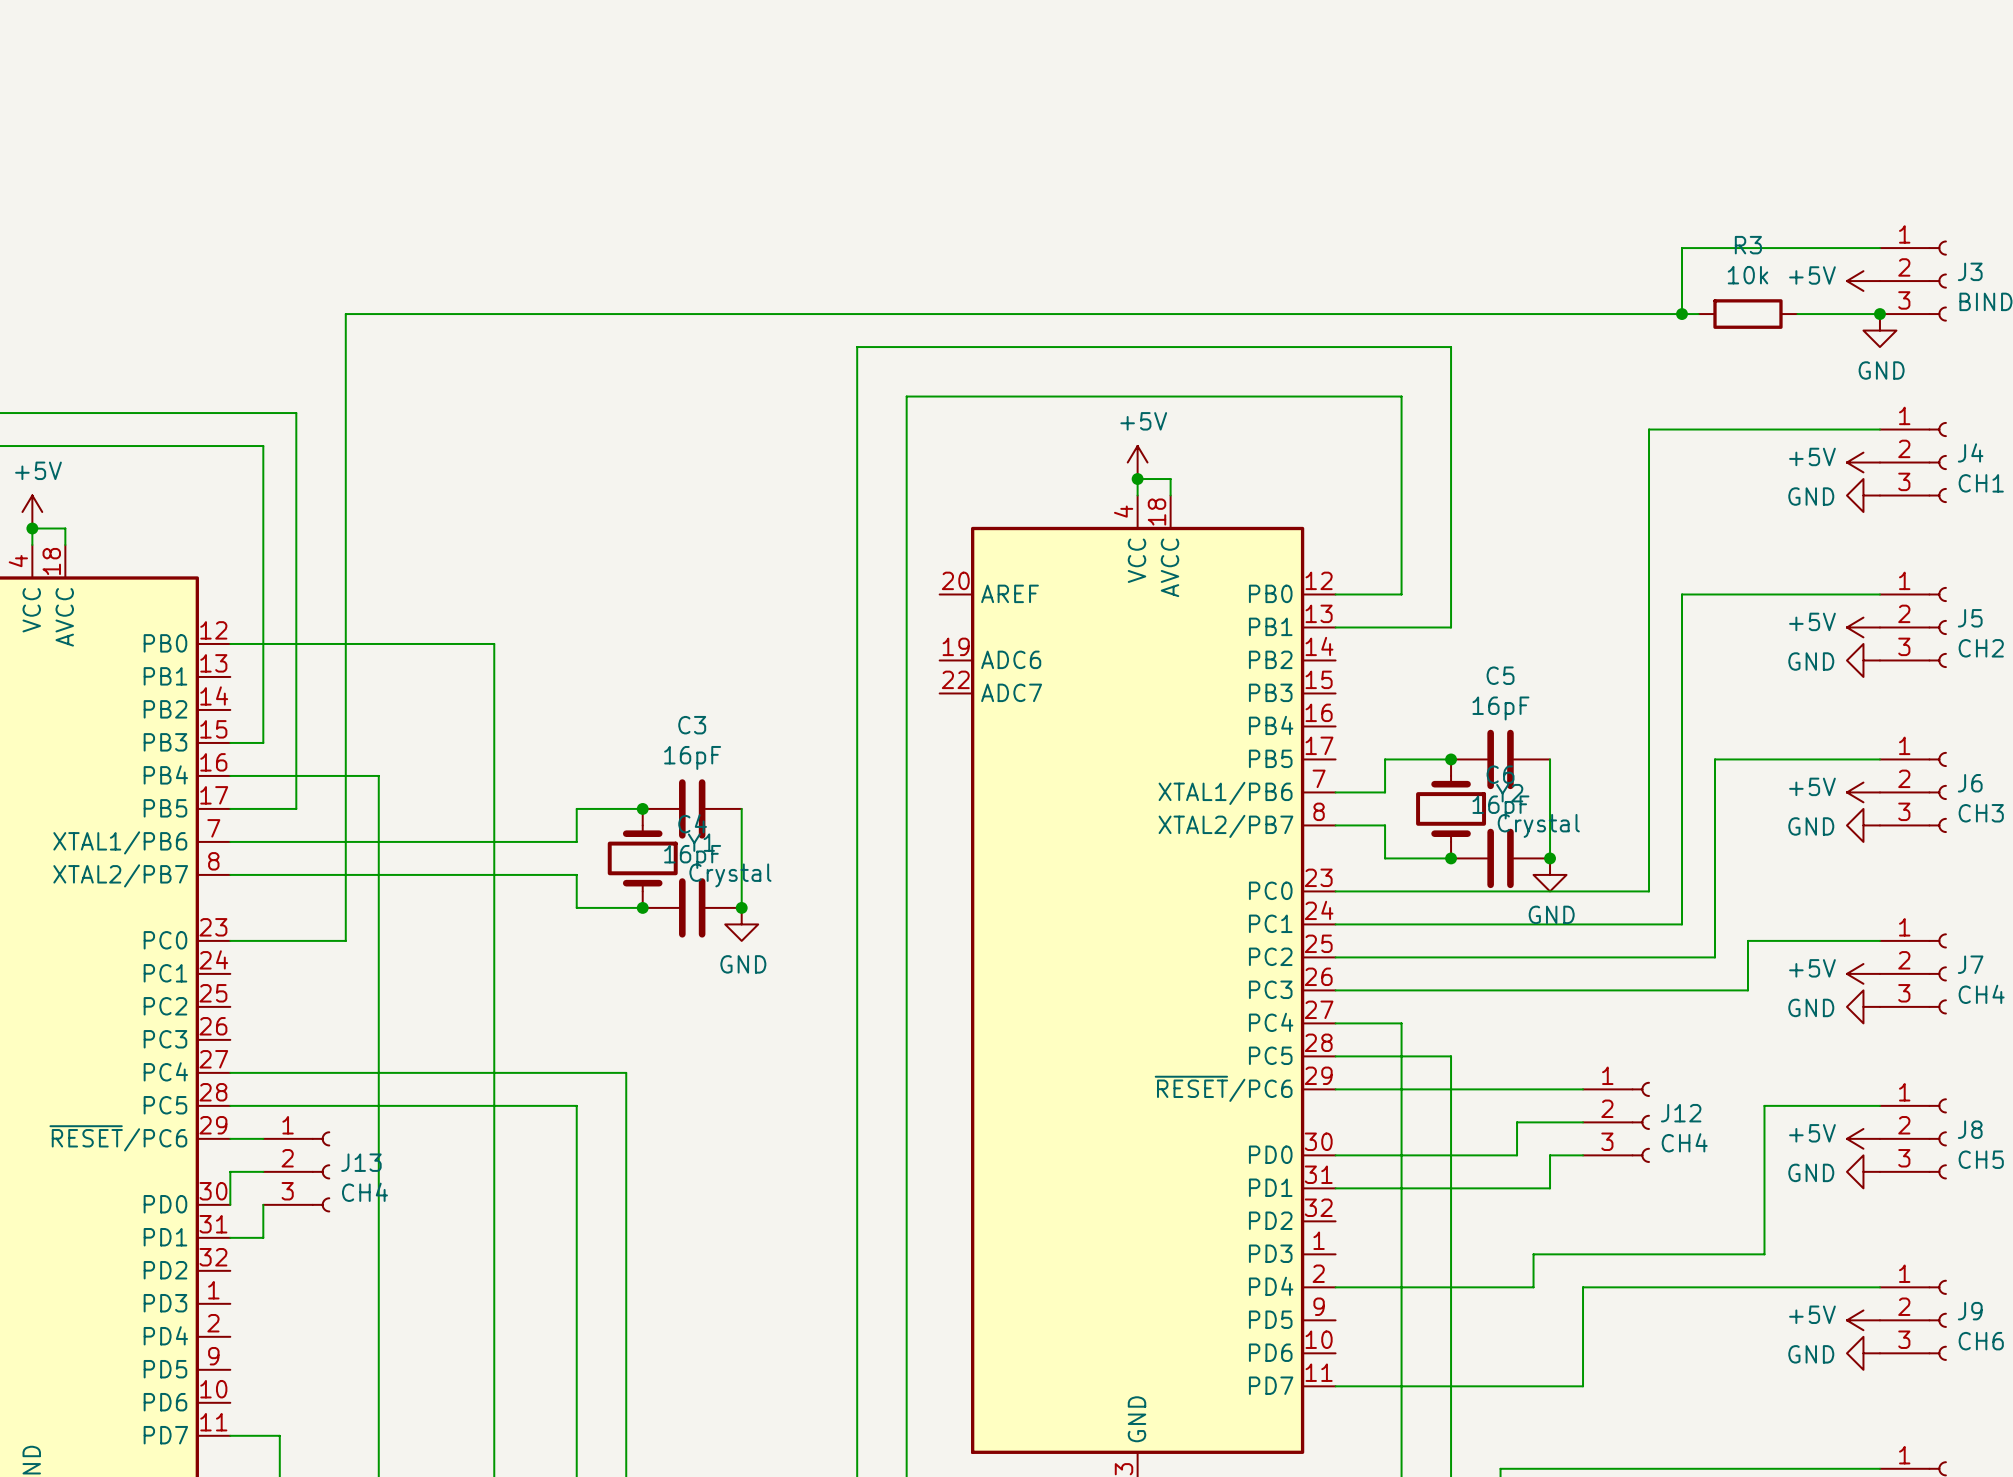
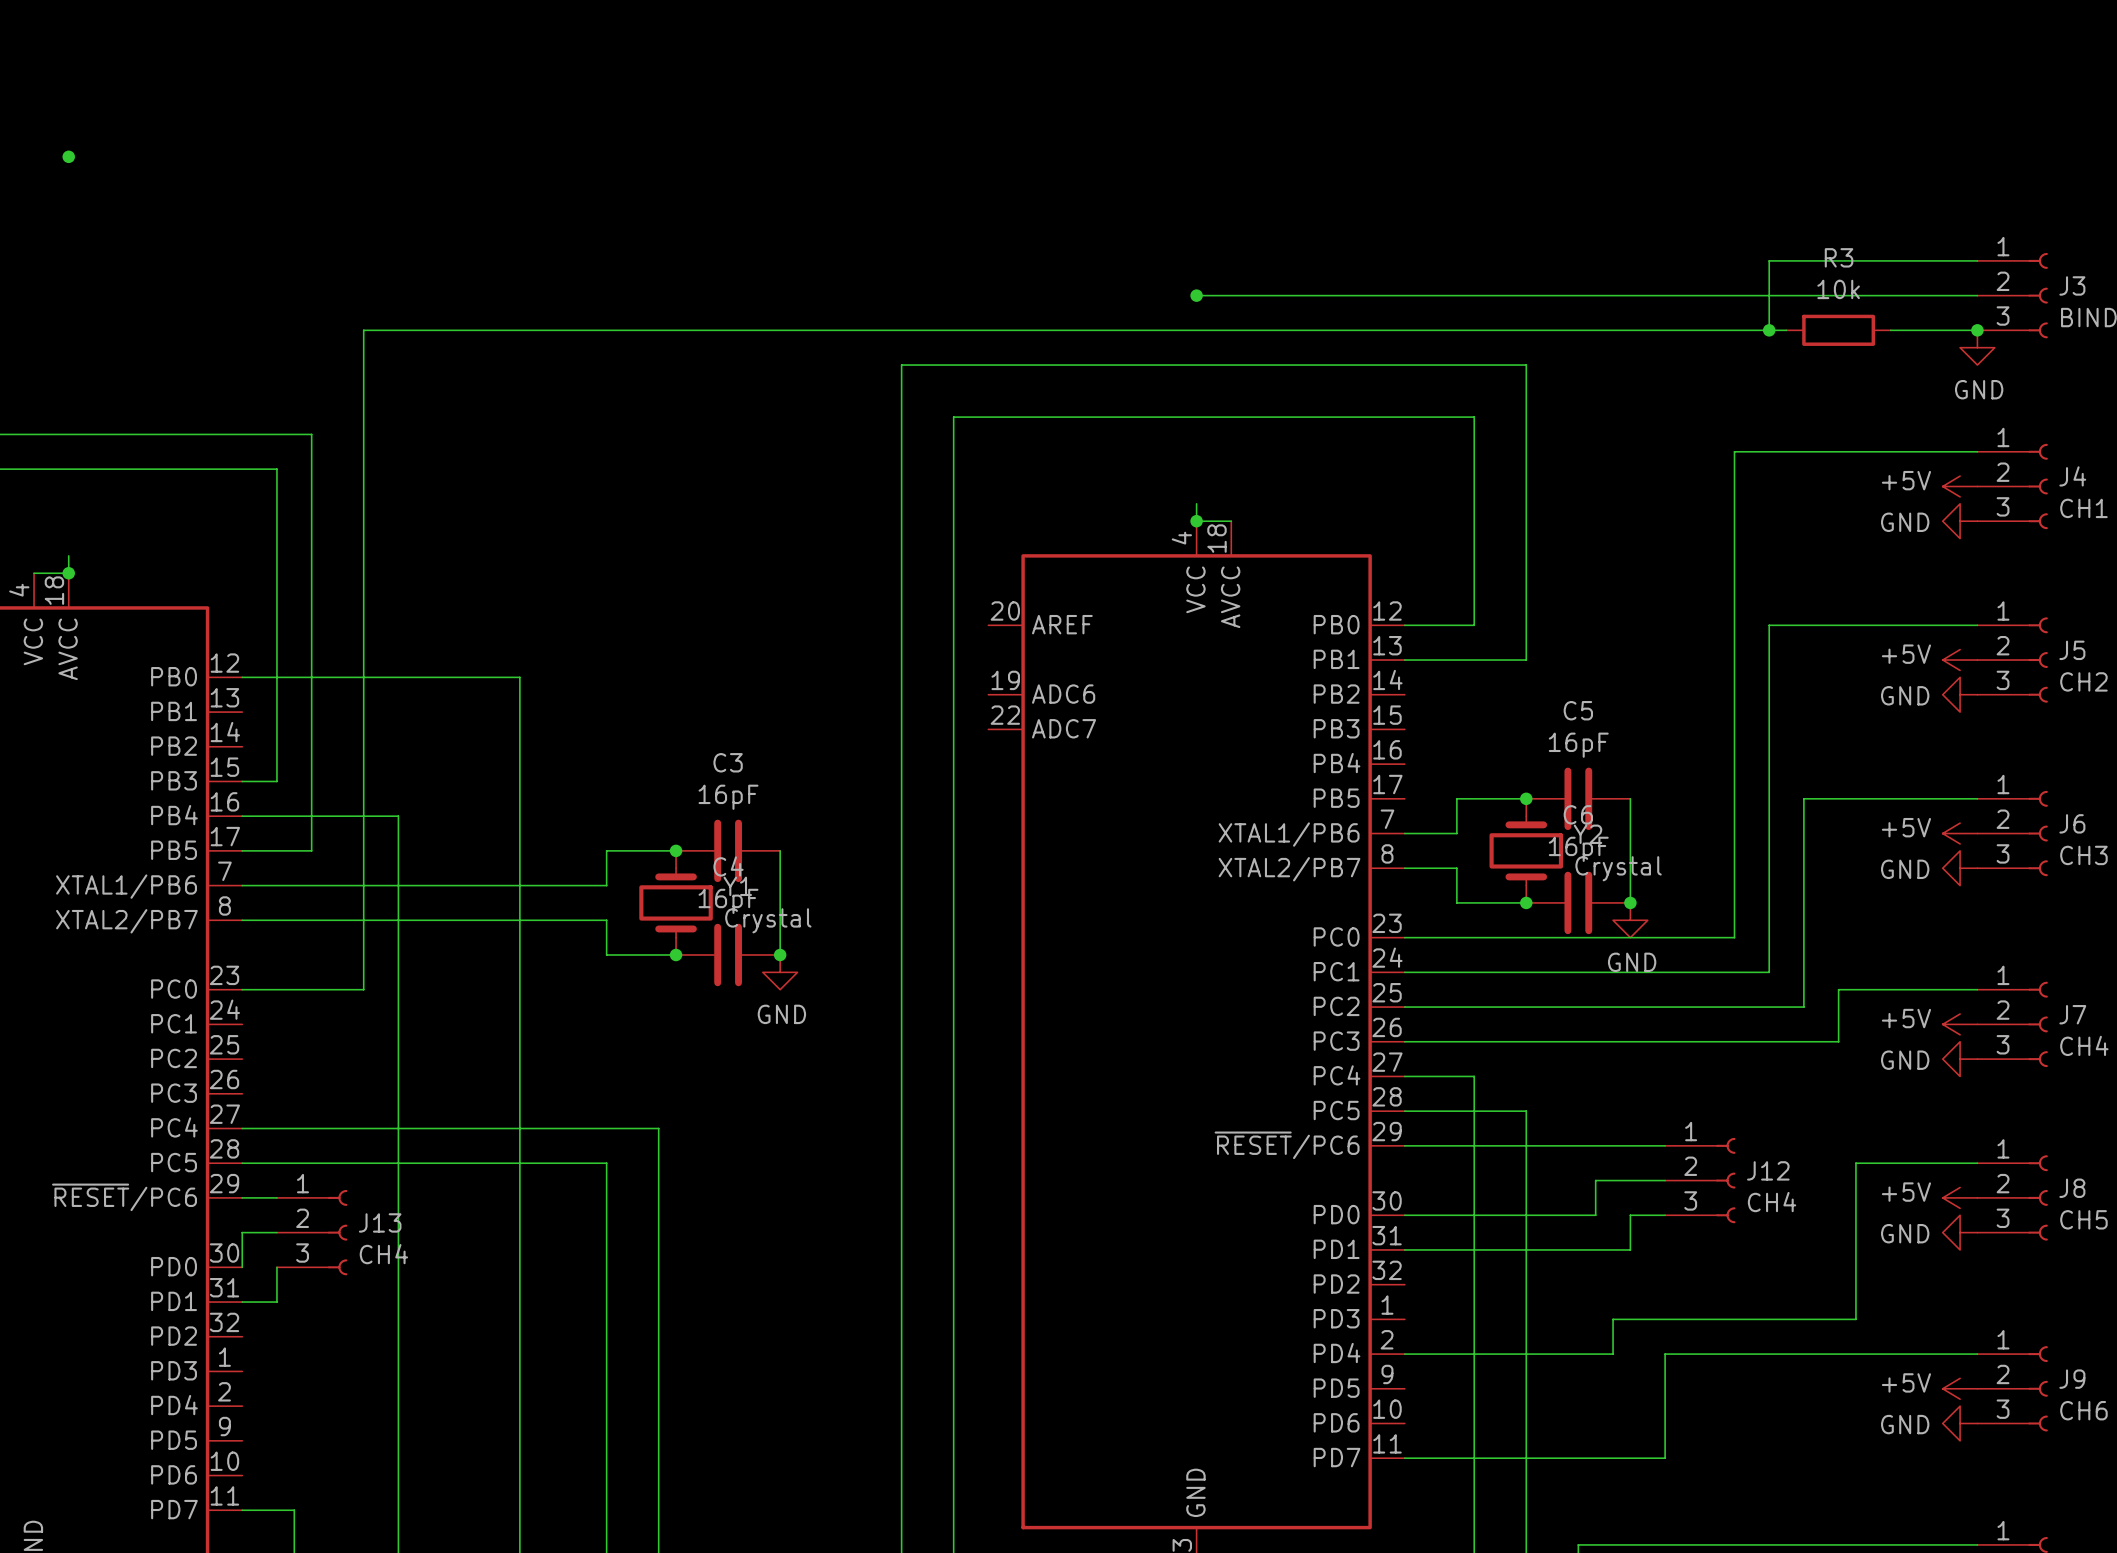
junction: none -> (68, 156)
wire: none -> (1196, 295) (1977, 295)
junction: none -> (1196, 295)
power symbol: +5V (1863, 281) -> none
power symbol: +5V (1137, 462) -> none
wire: (1137, 479) (1170, 479) (1170, 495) -> (1196, 521) (1231, 521)
junction position: (1137, 479) -> (1196, 521)
power symbol: +5V (32, 512) -> none
junction position: (32, 528) -> (68, 573)
wire: (65, 528) (32, 528) (32, 545) -> (68, 573) (34, 573)

